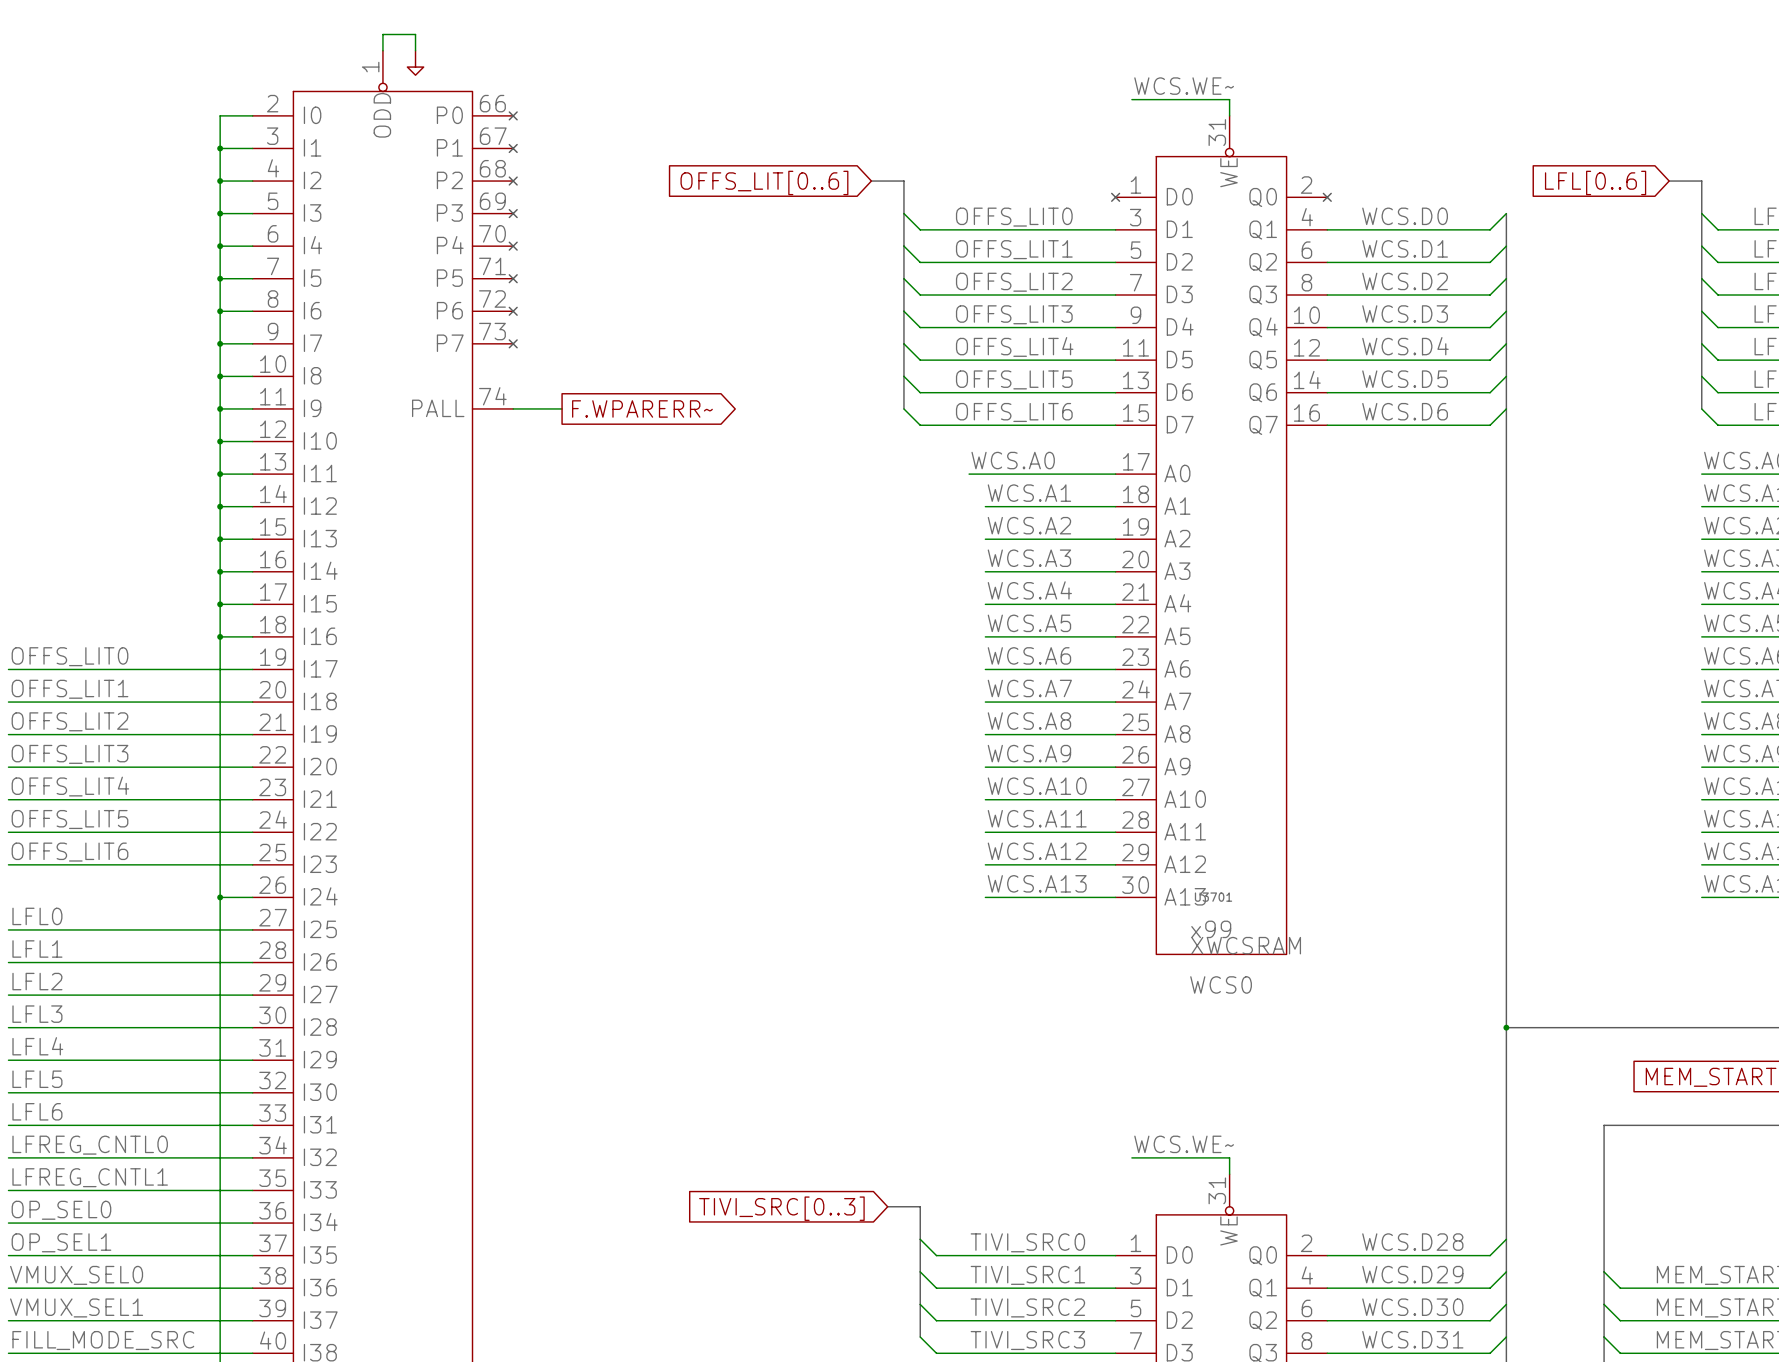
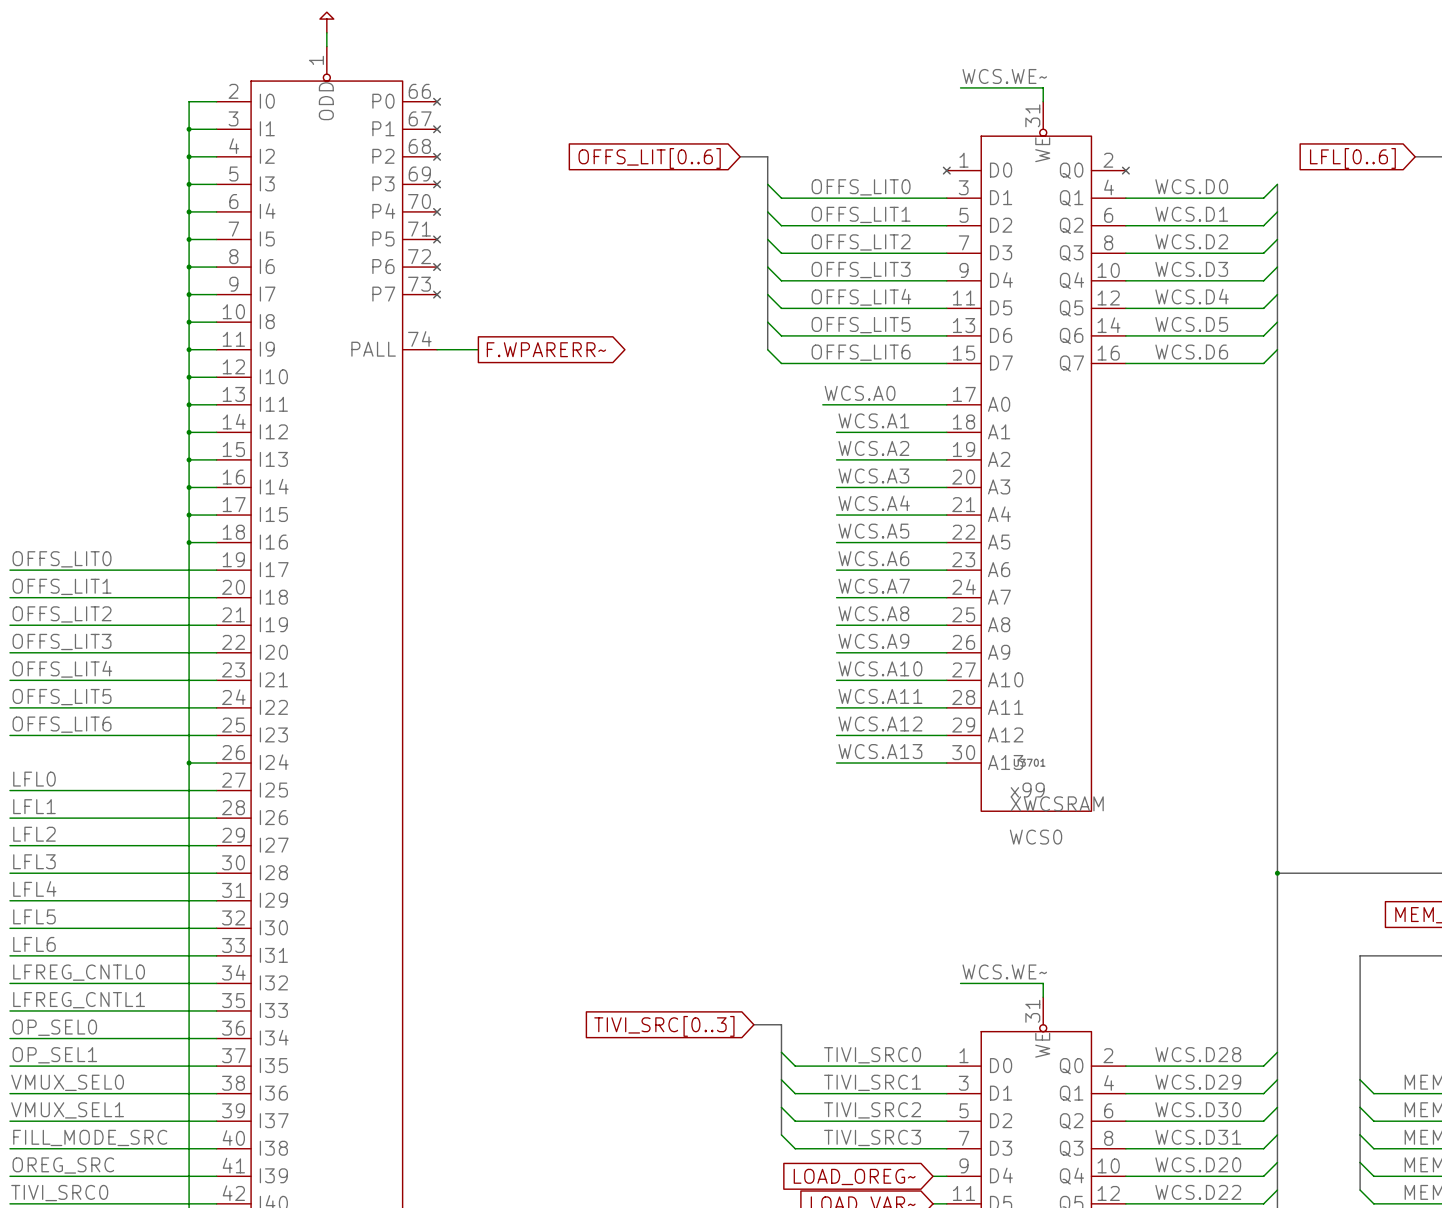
wire: (382, 34) (415, 34) (415, 50) -> none
power symbol position: (415, 63) -> (326, 22)
power symbol rotation: 0° (415, 71) -> 180° (326, 15)

